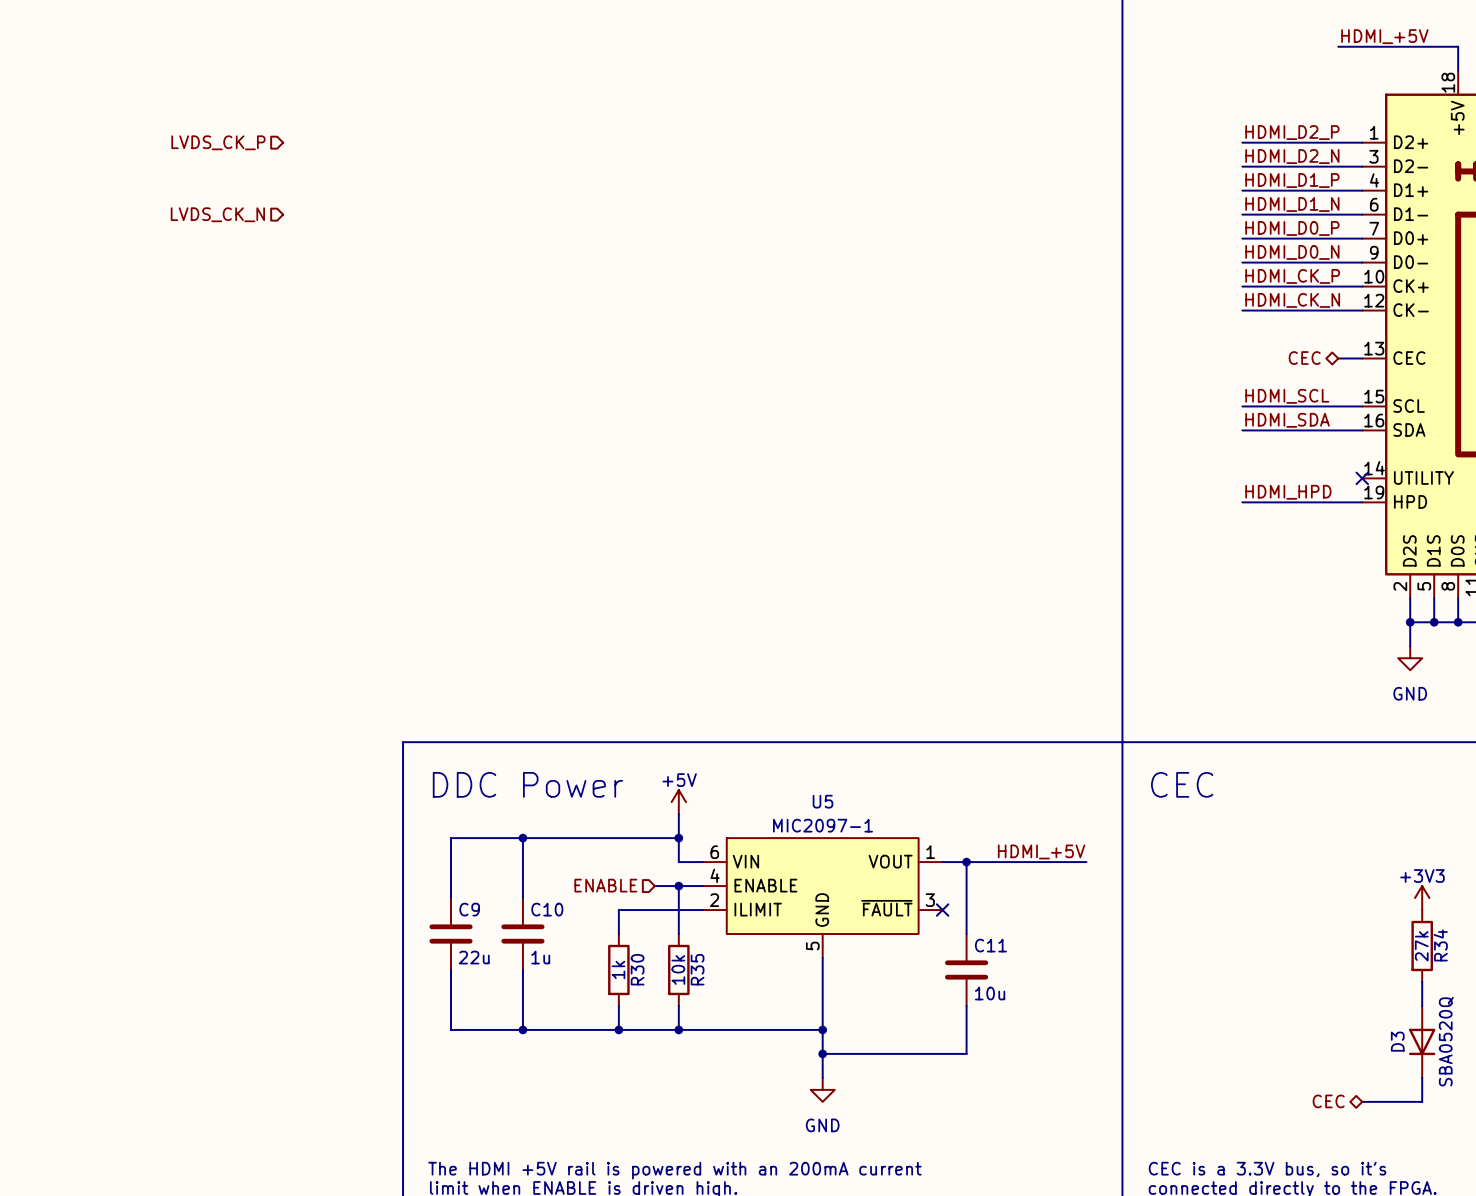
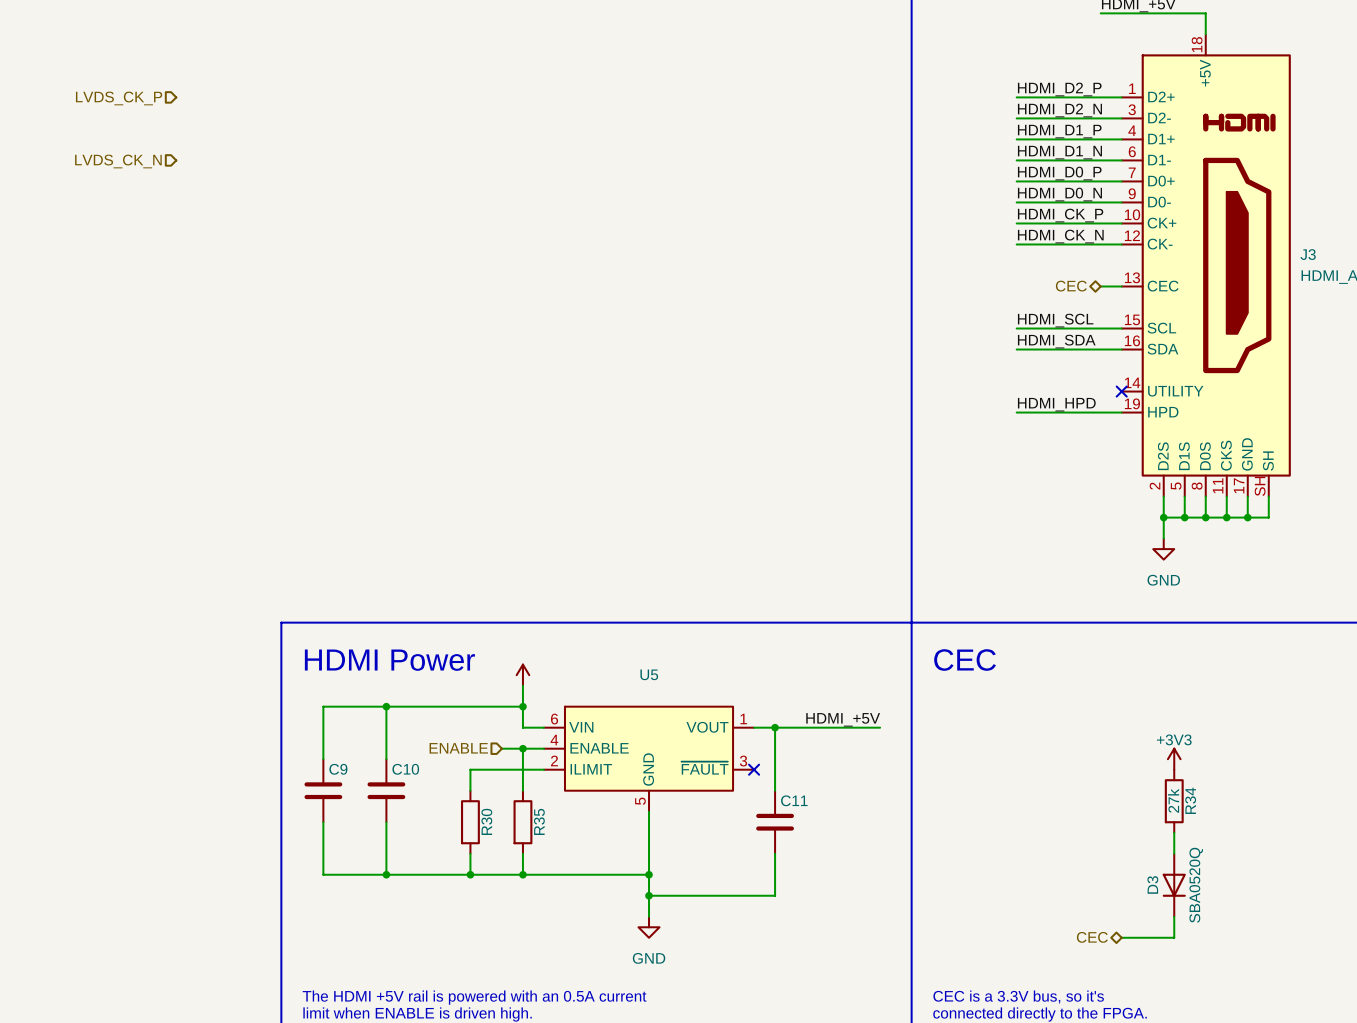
power symbol text: +5V (679, 780) -> none
text: DDC Power (527, 784) -> HDMI Power (389, 660)
U5 value: MIC2097-1 (822, 825) -> none
C9 value: 22u (474, 957) -> none
C10 value: 1u (540, 957) -> none
R30 value: 1k (618, 969) -> none
R35 value: 10k (678, 969) -> none
C11 value: 10u (990, 993) -> none
text: The HDMI +5V rail is powered with an 200mA current (674, 1170) -> The HDMI +5V rail is powered with an 0.5A current (474, 997)

